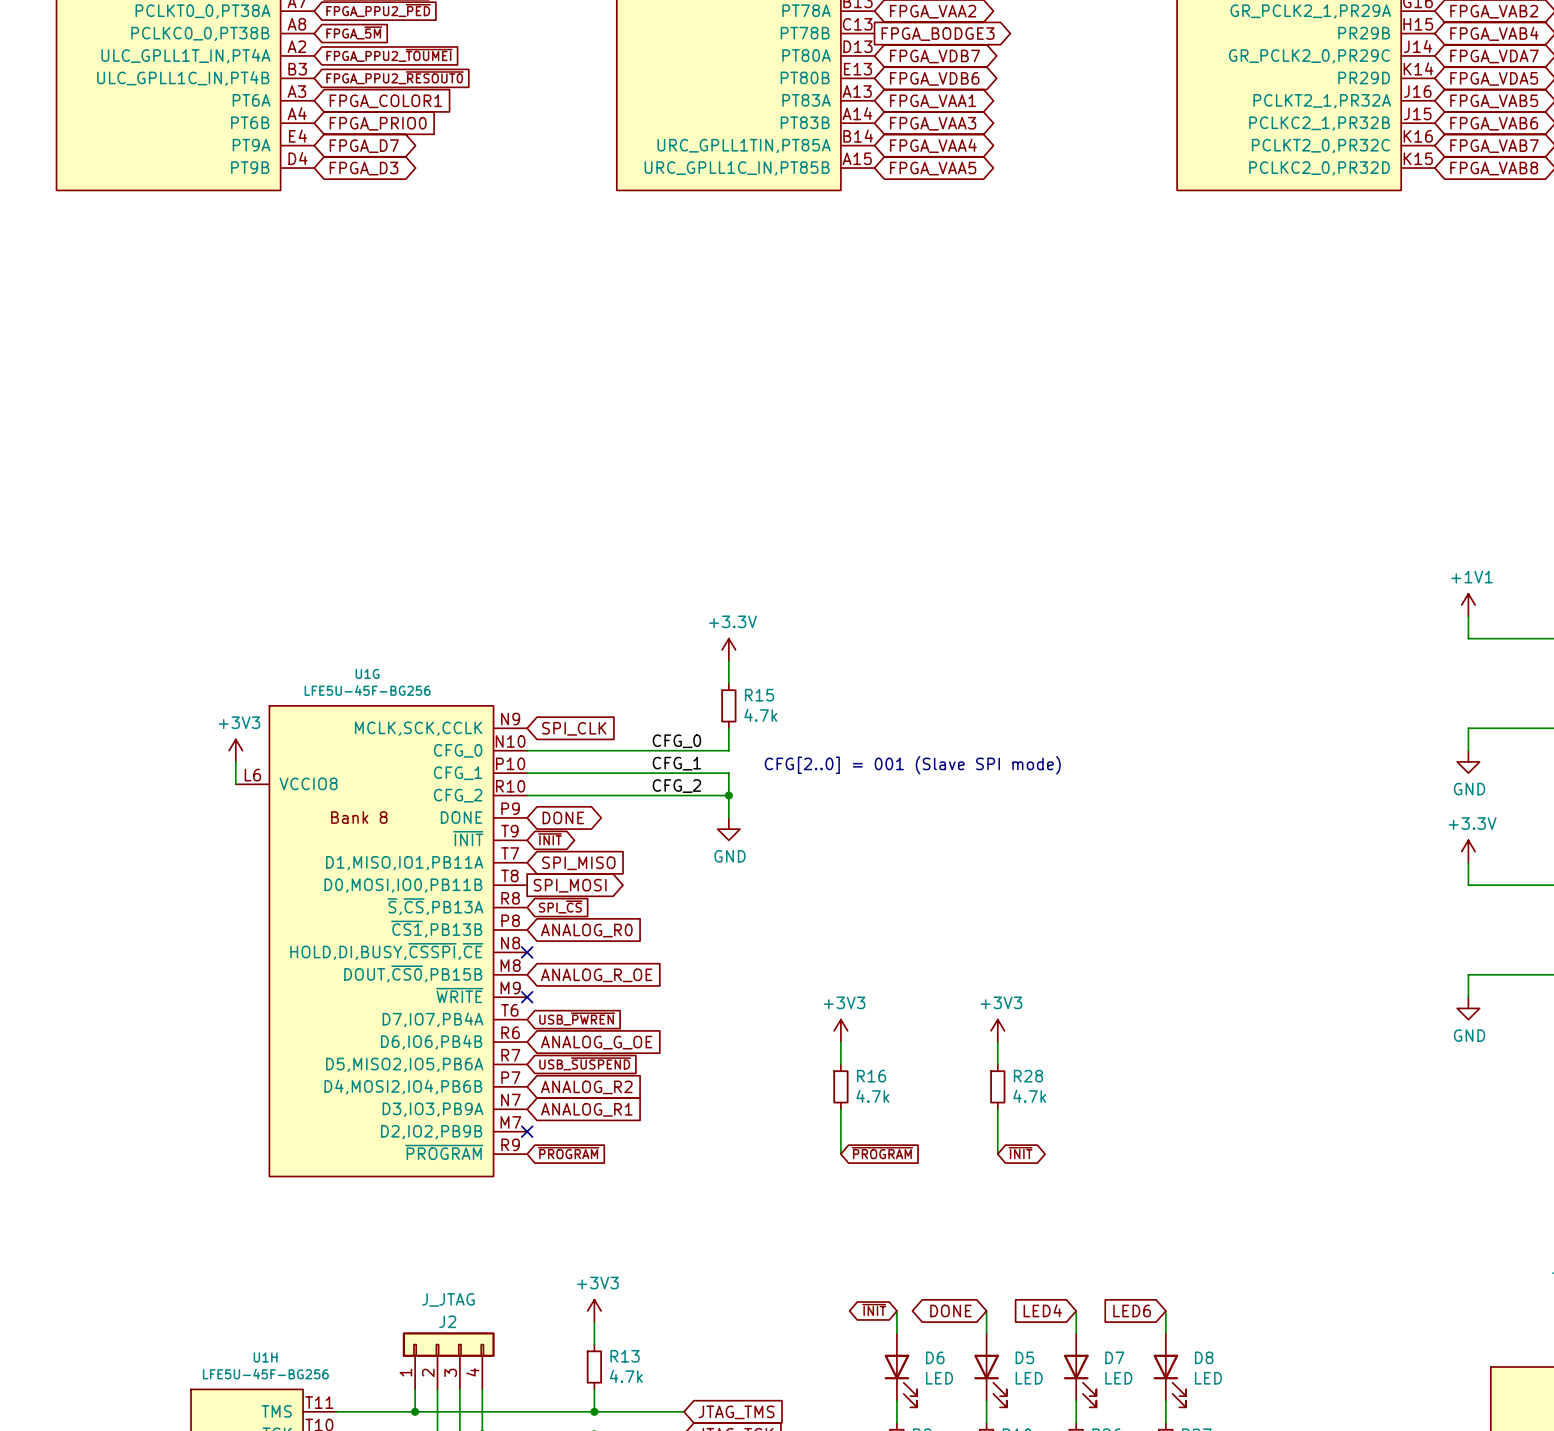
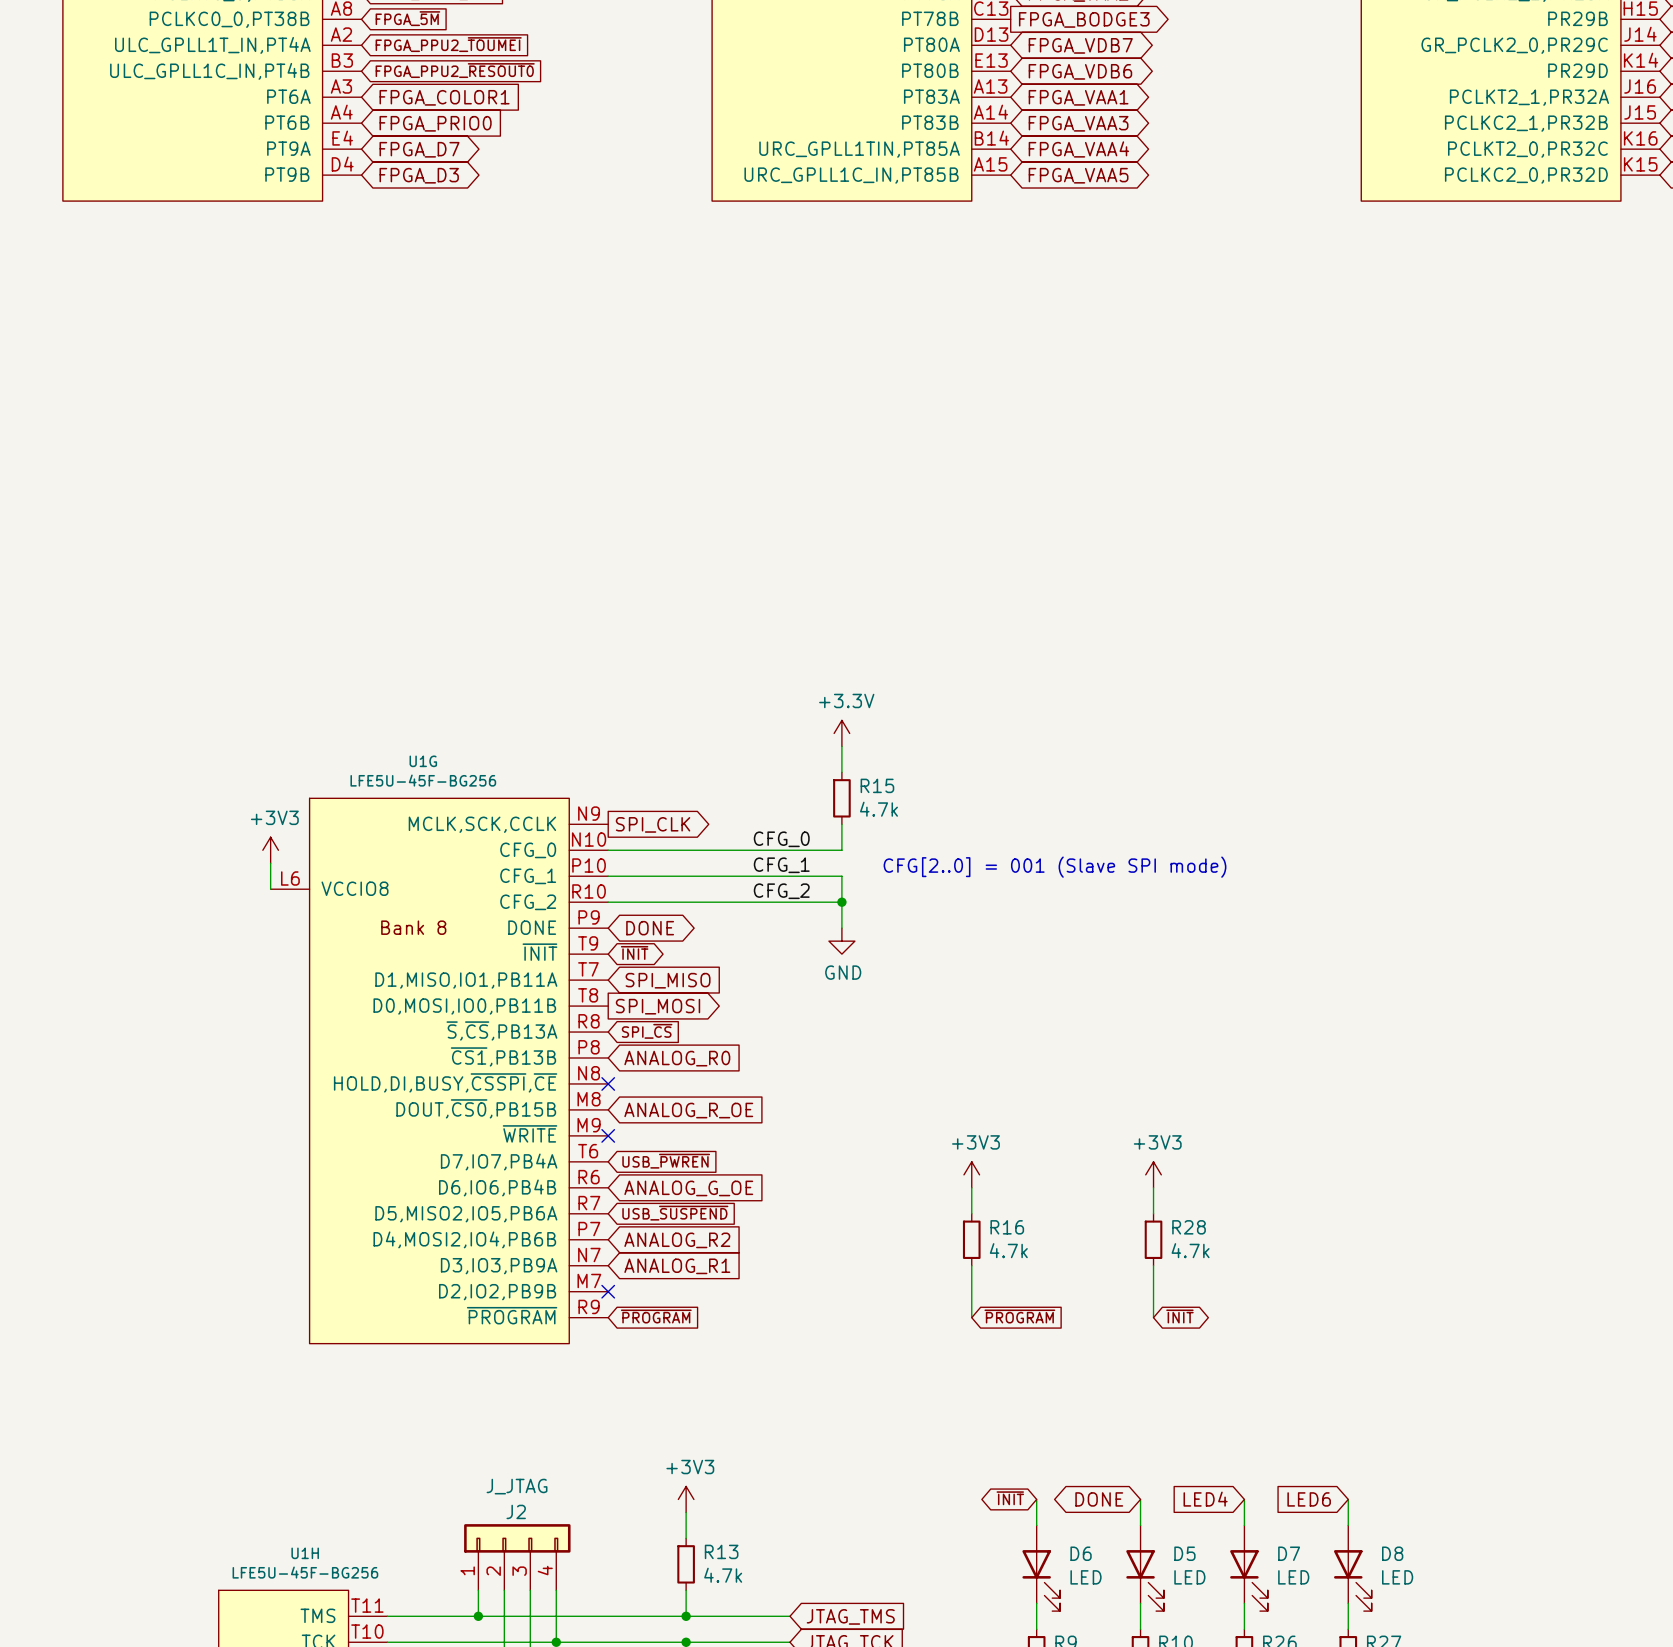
global label shape: input (574, 728) -> output (653, 824)

